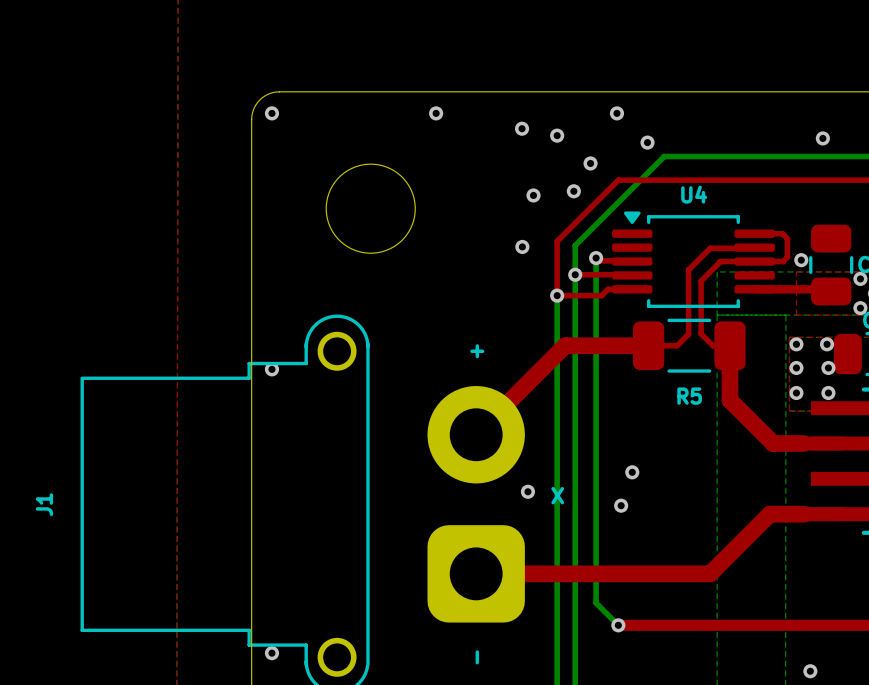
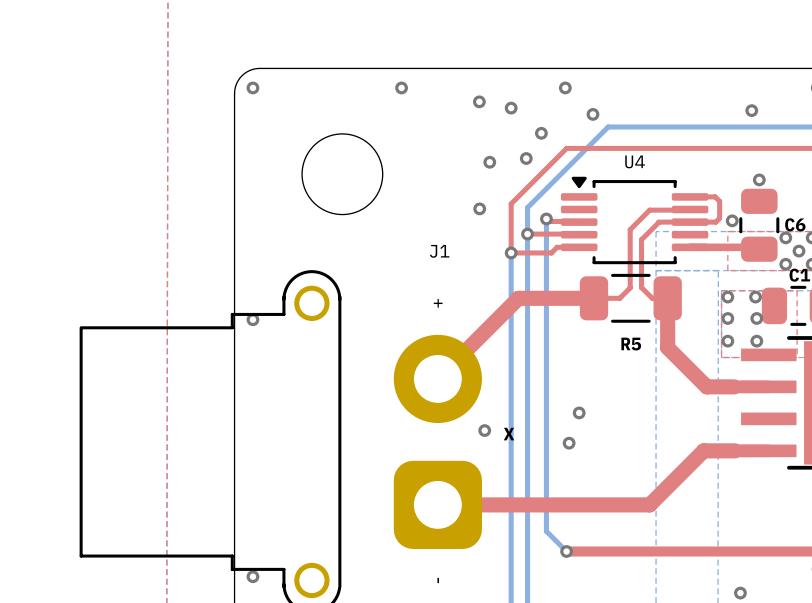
via: none -> (759, 179)
J1 name rotation: 0° (44, 504) -> 90° clockwise (439, 251)
J1 name position: J1 (44, 504) -> J1 (439, 251)

